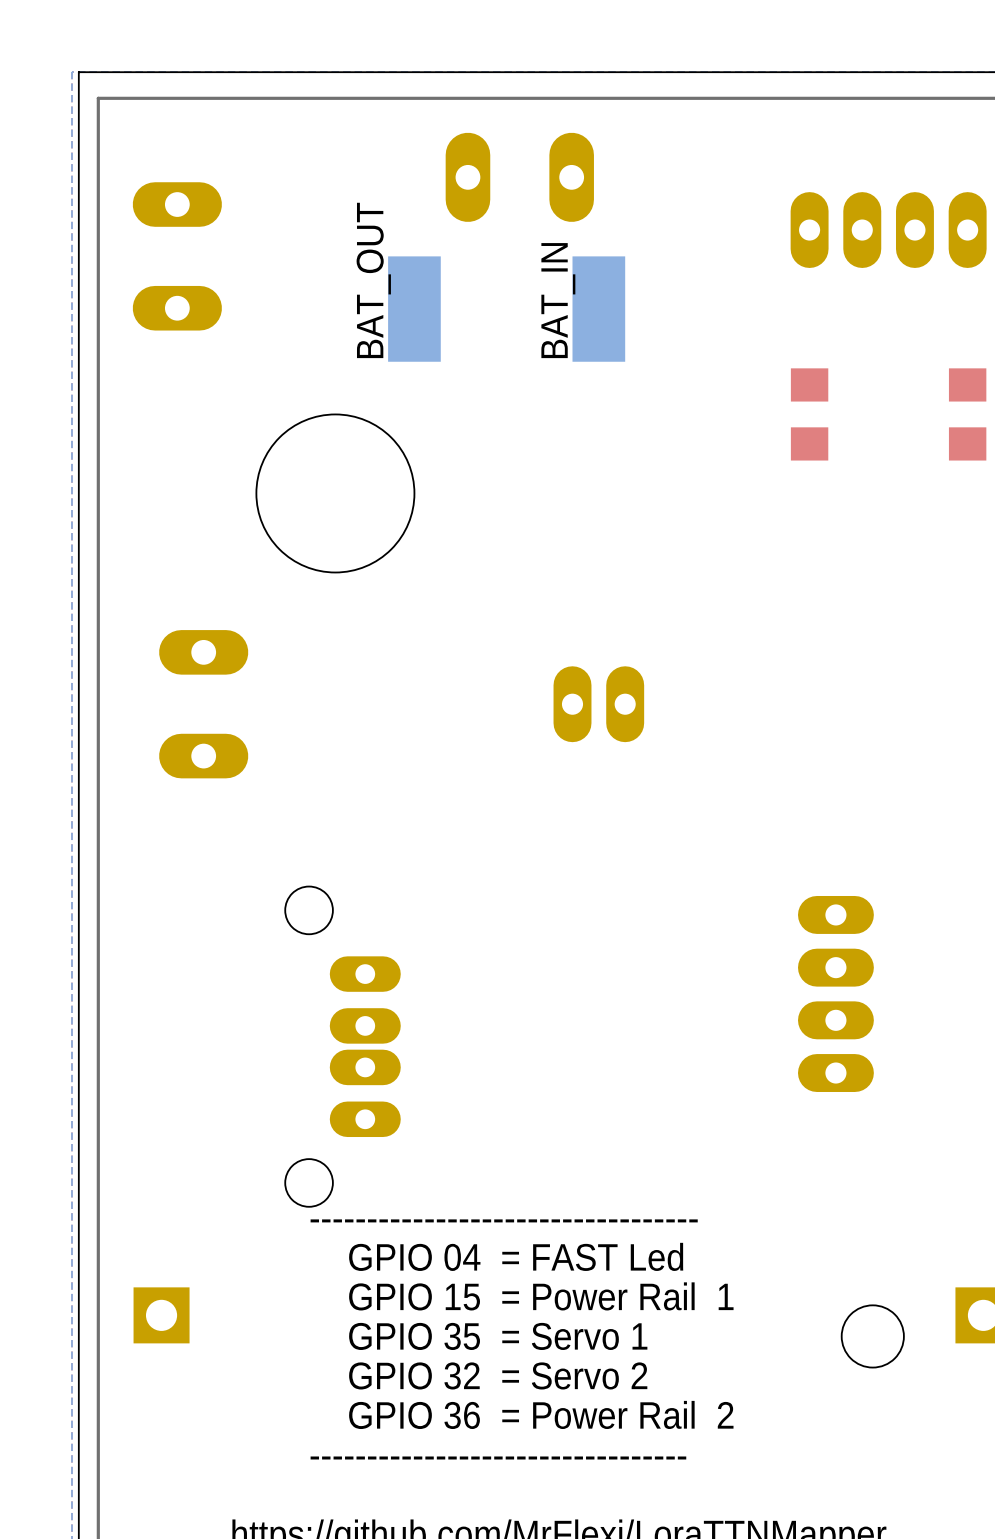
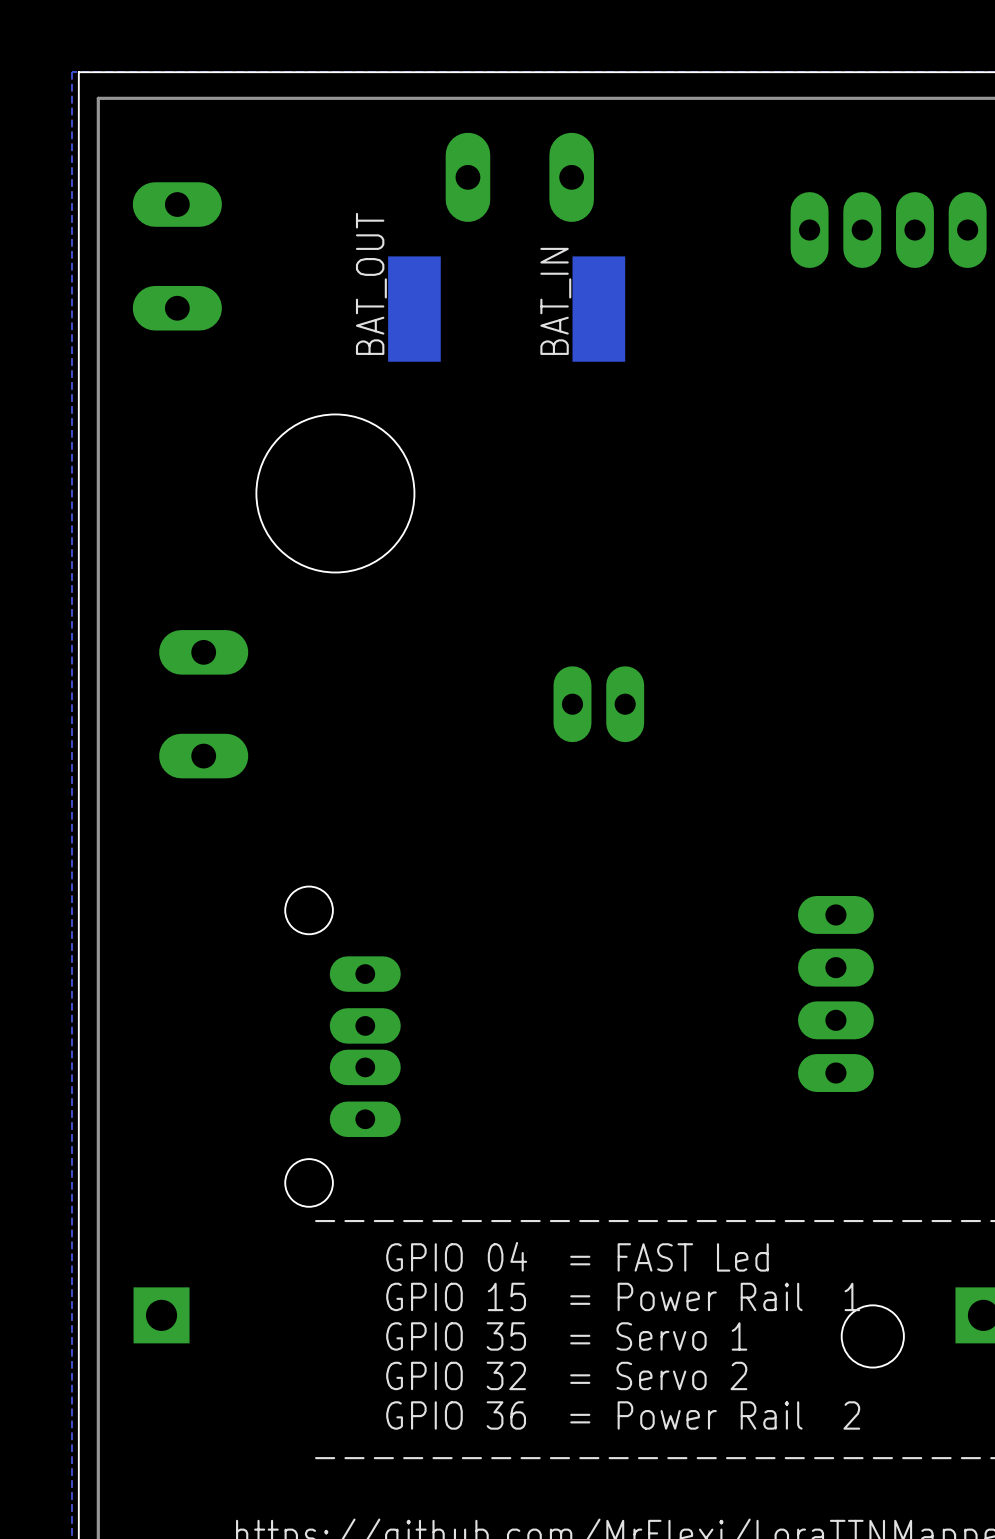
part: (809, 414) -> none
part: (967, 414) -> none

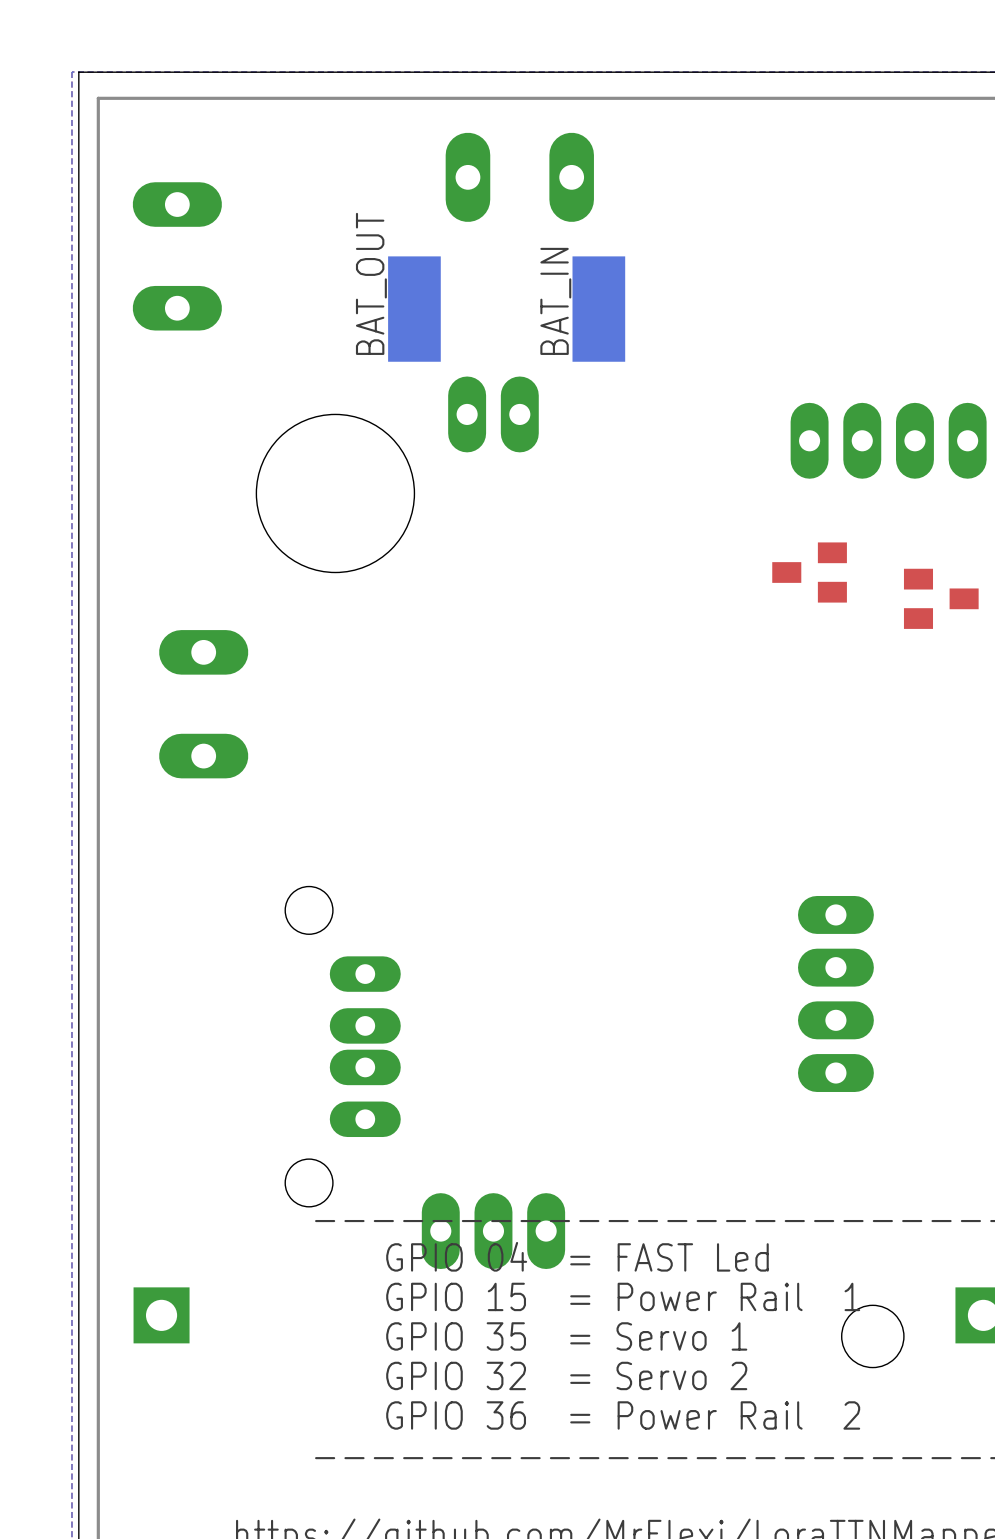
part position: (888, 230) -> (888, 440)
part: none -> (809, 572)
part: none -> (941, 598)
part position: (598, 704) -> (493, 414)
part: none -> (493, 1231)

